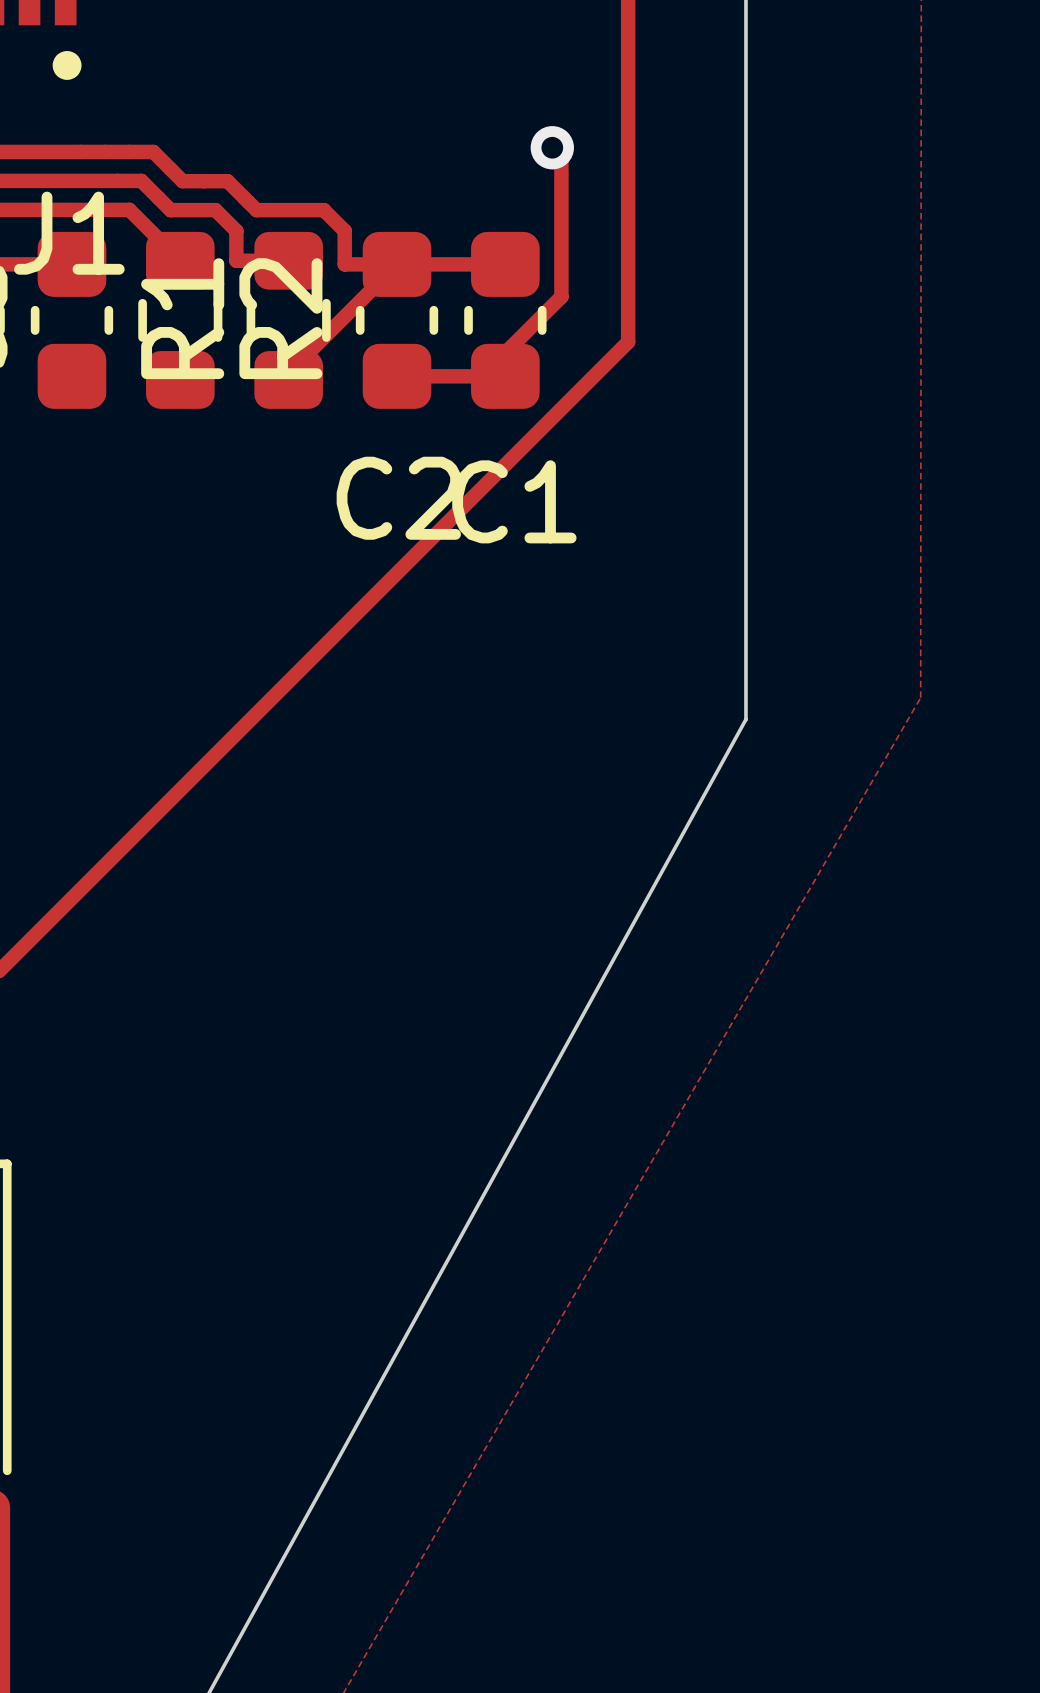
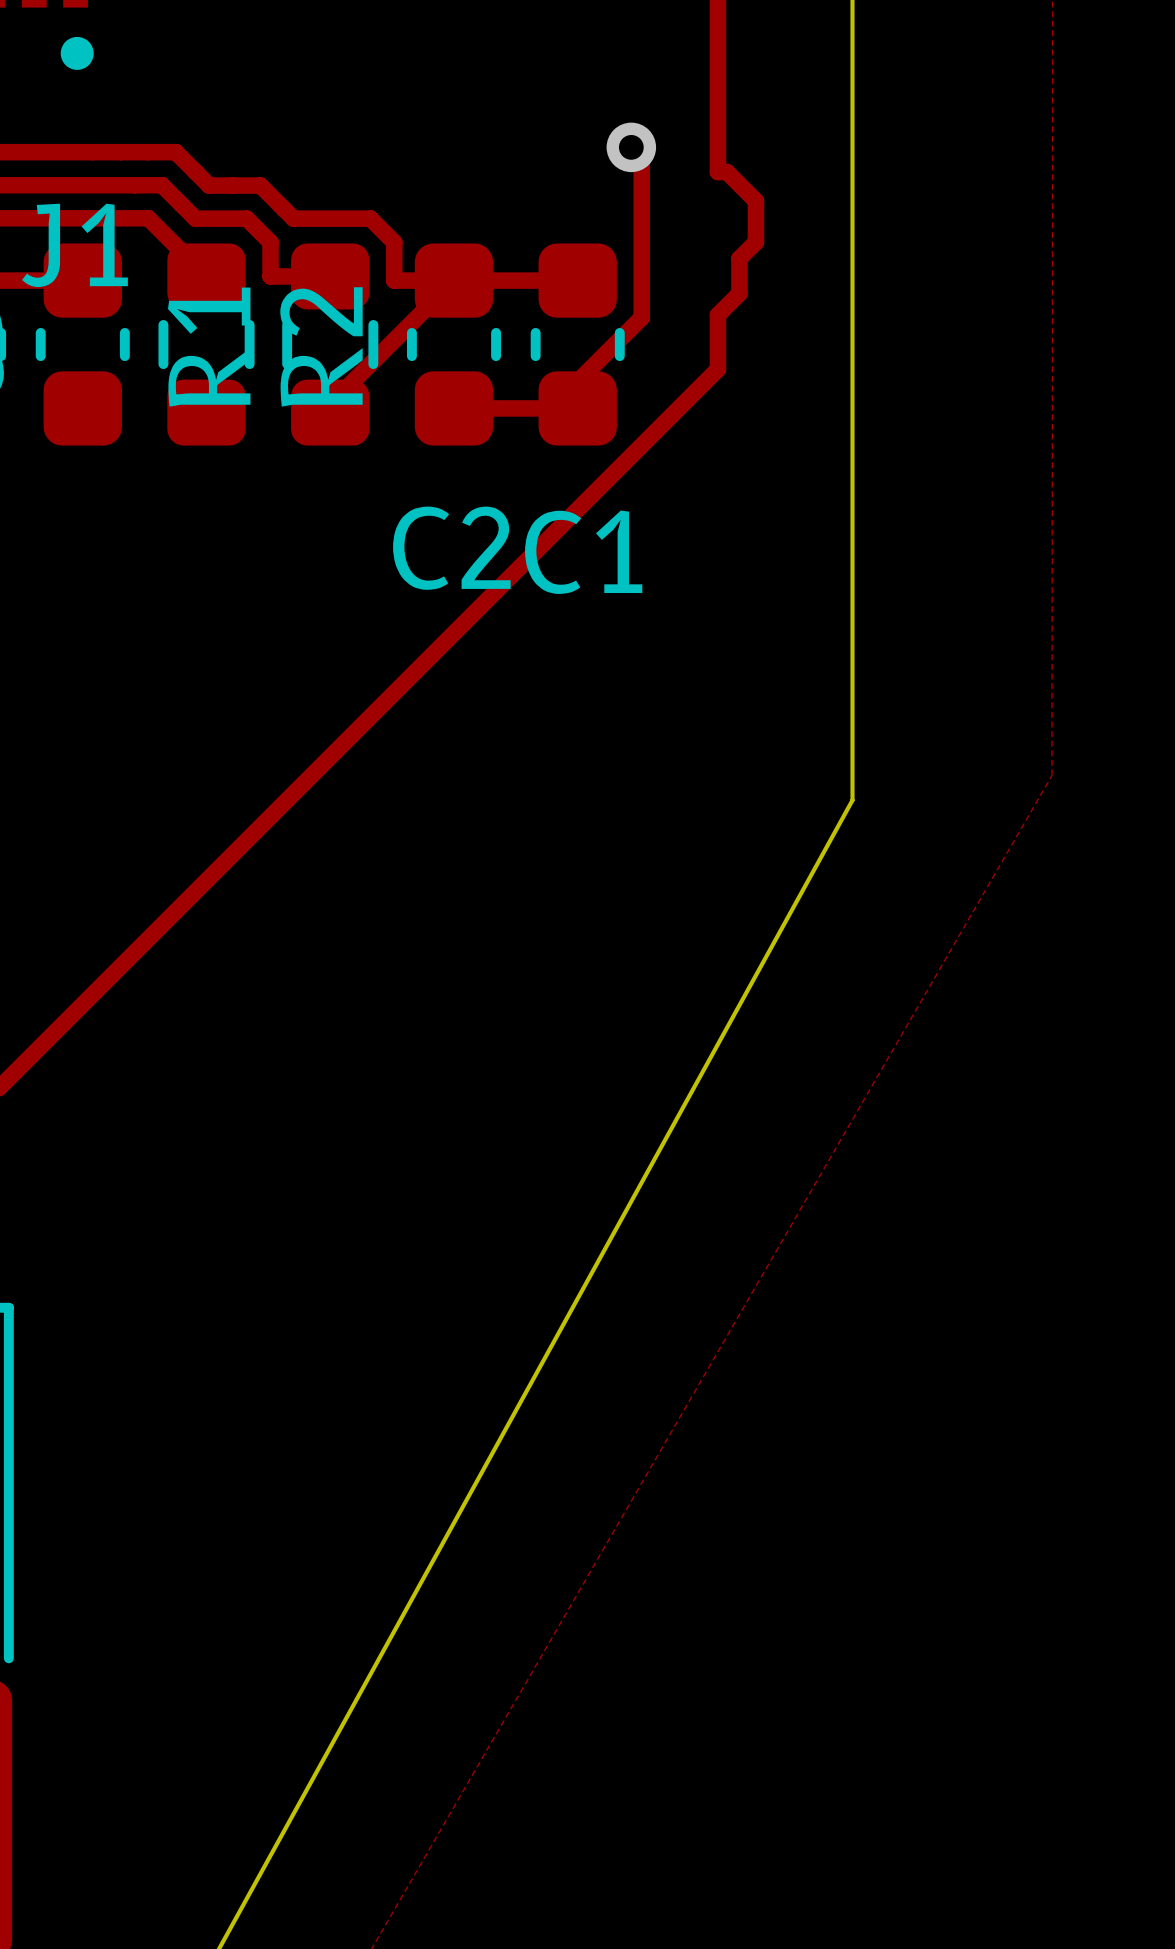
track: (628, 169) (628, 294) -> (717, 172) (726, 172) (755, 201) (755, 242) (739, 258) (739, 293) (717, 315)

